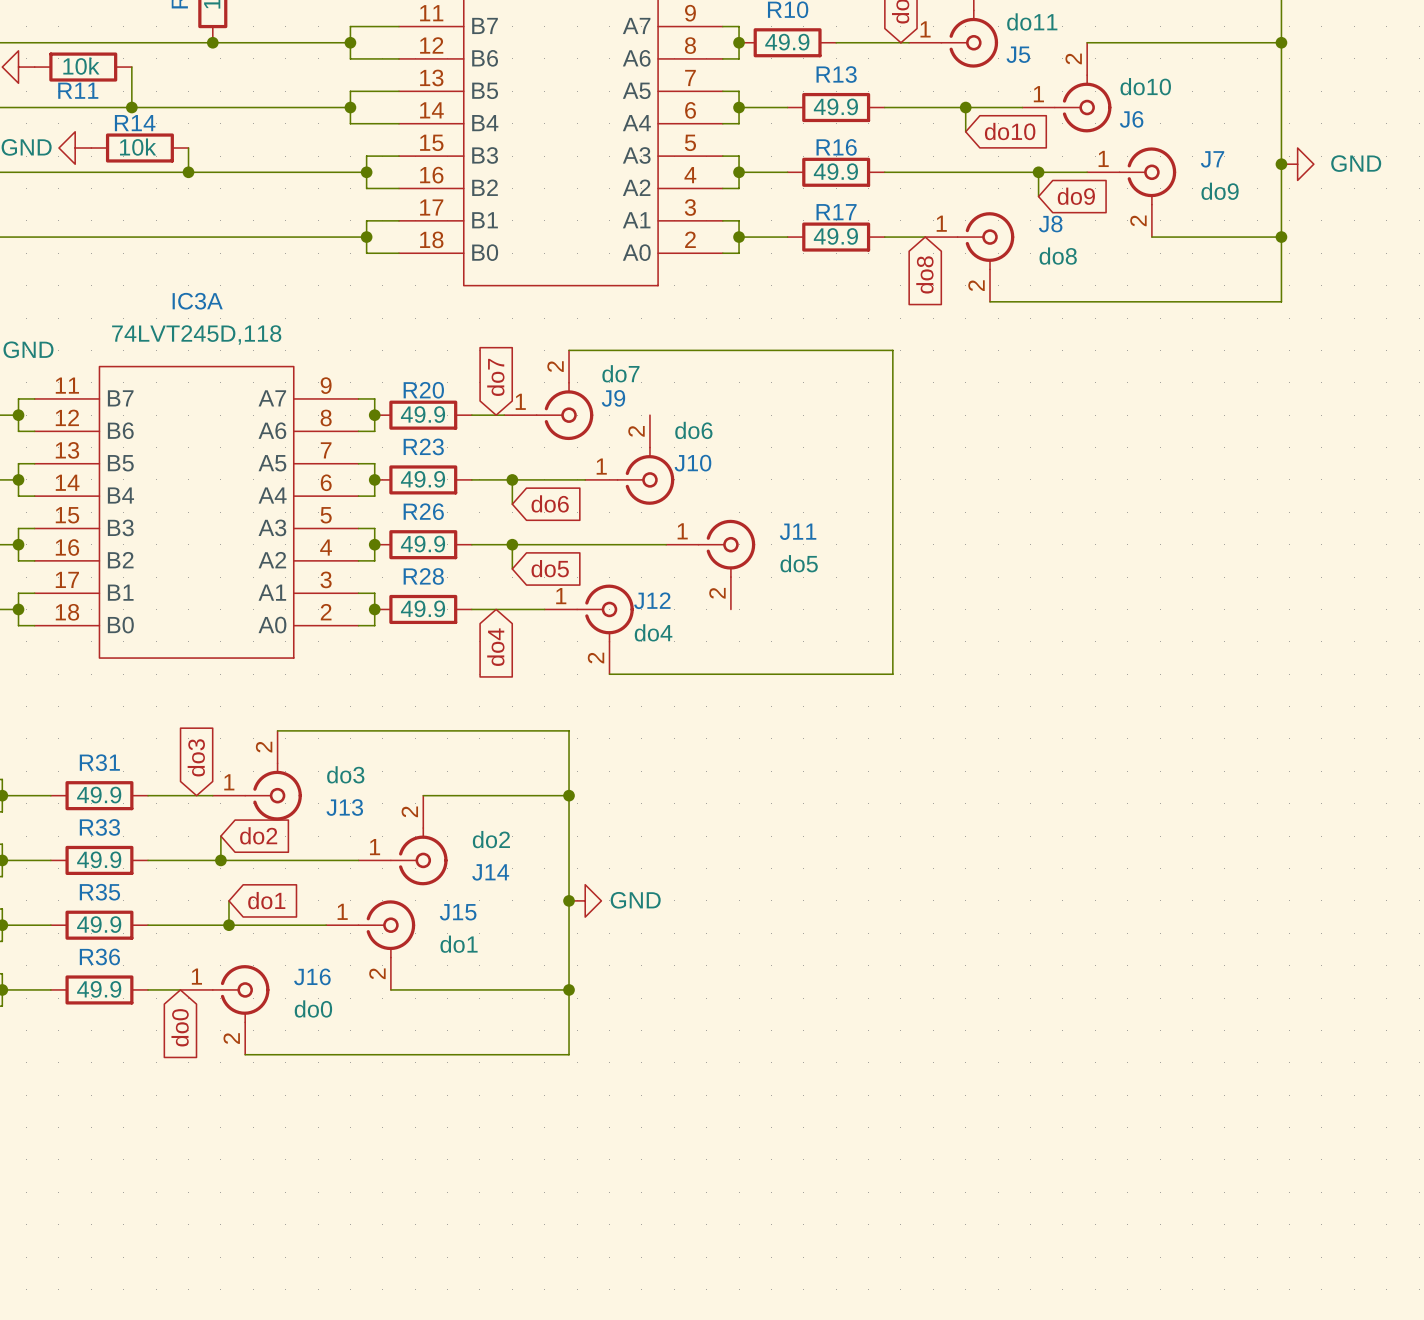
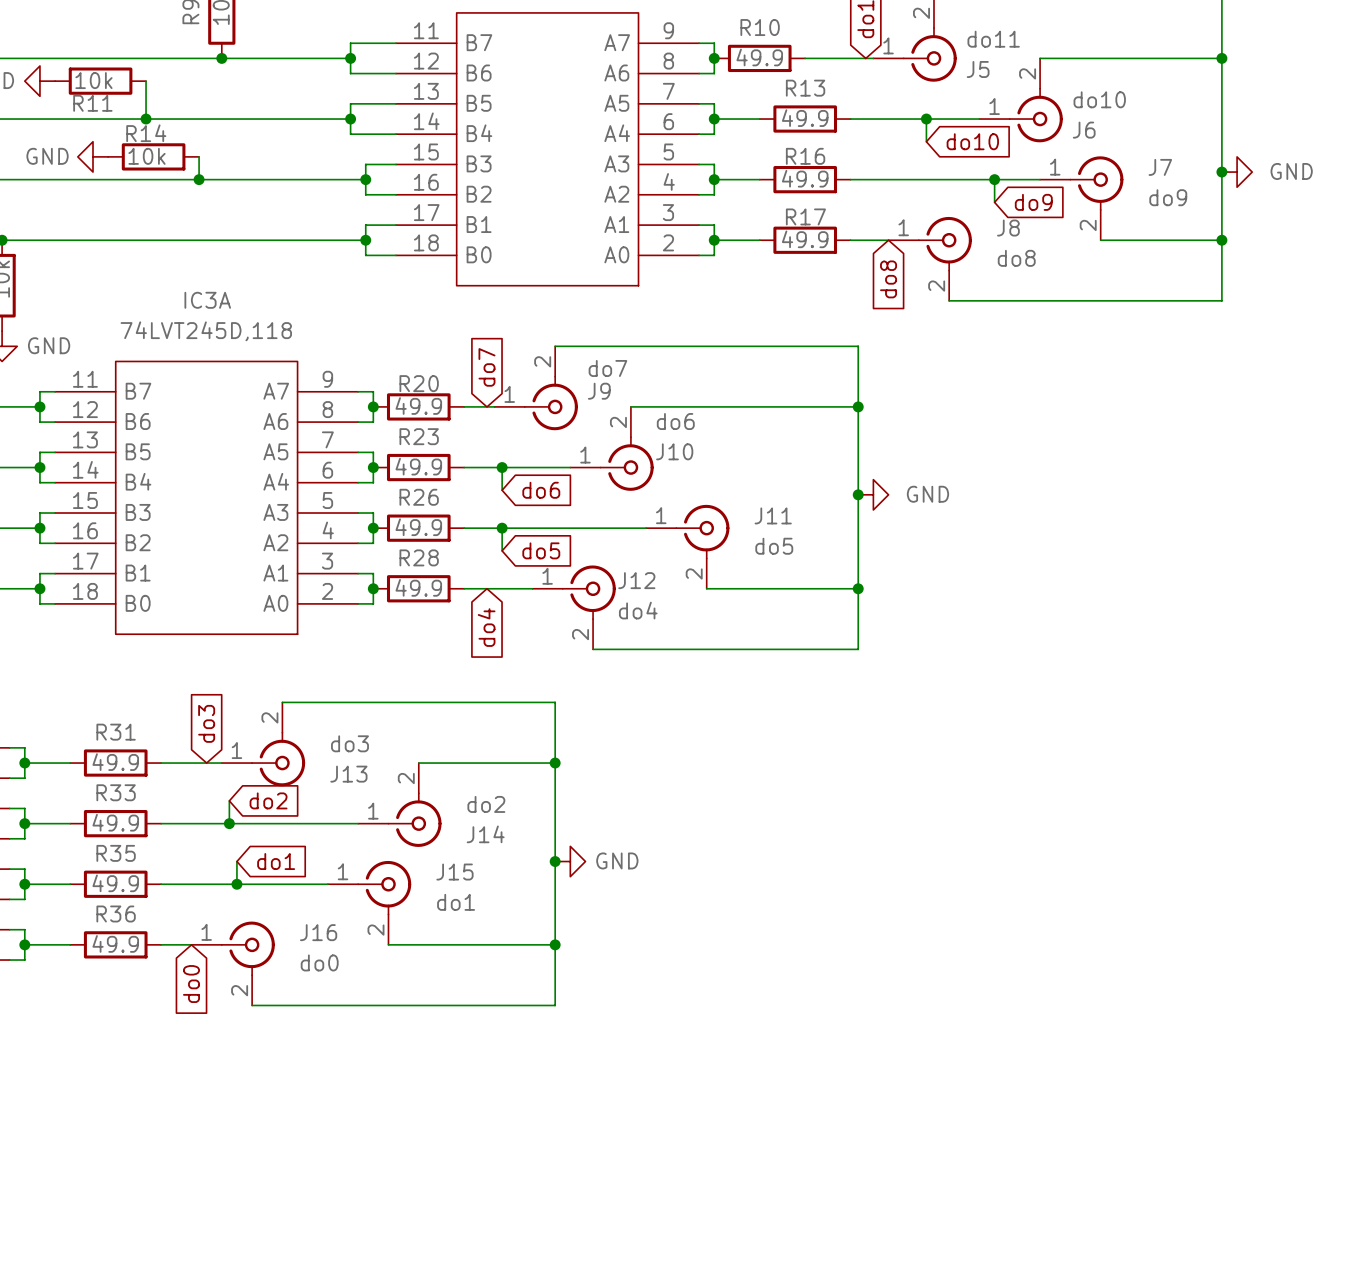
wire: none -> (630, 406) (858, 406)
junction: none -> (858, 406)
junction: none -> (858, 494)
power symbol: none -> GND (873, 494)
wire: none -> (706, 588) (858, 588)
junction: none -> (858, 588)

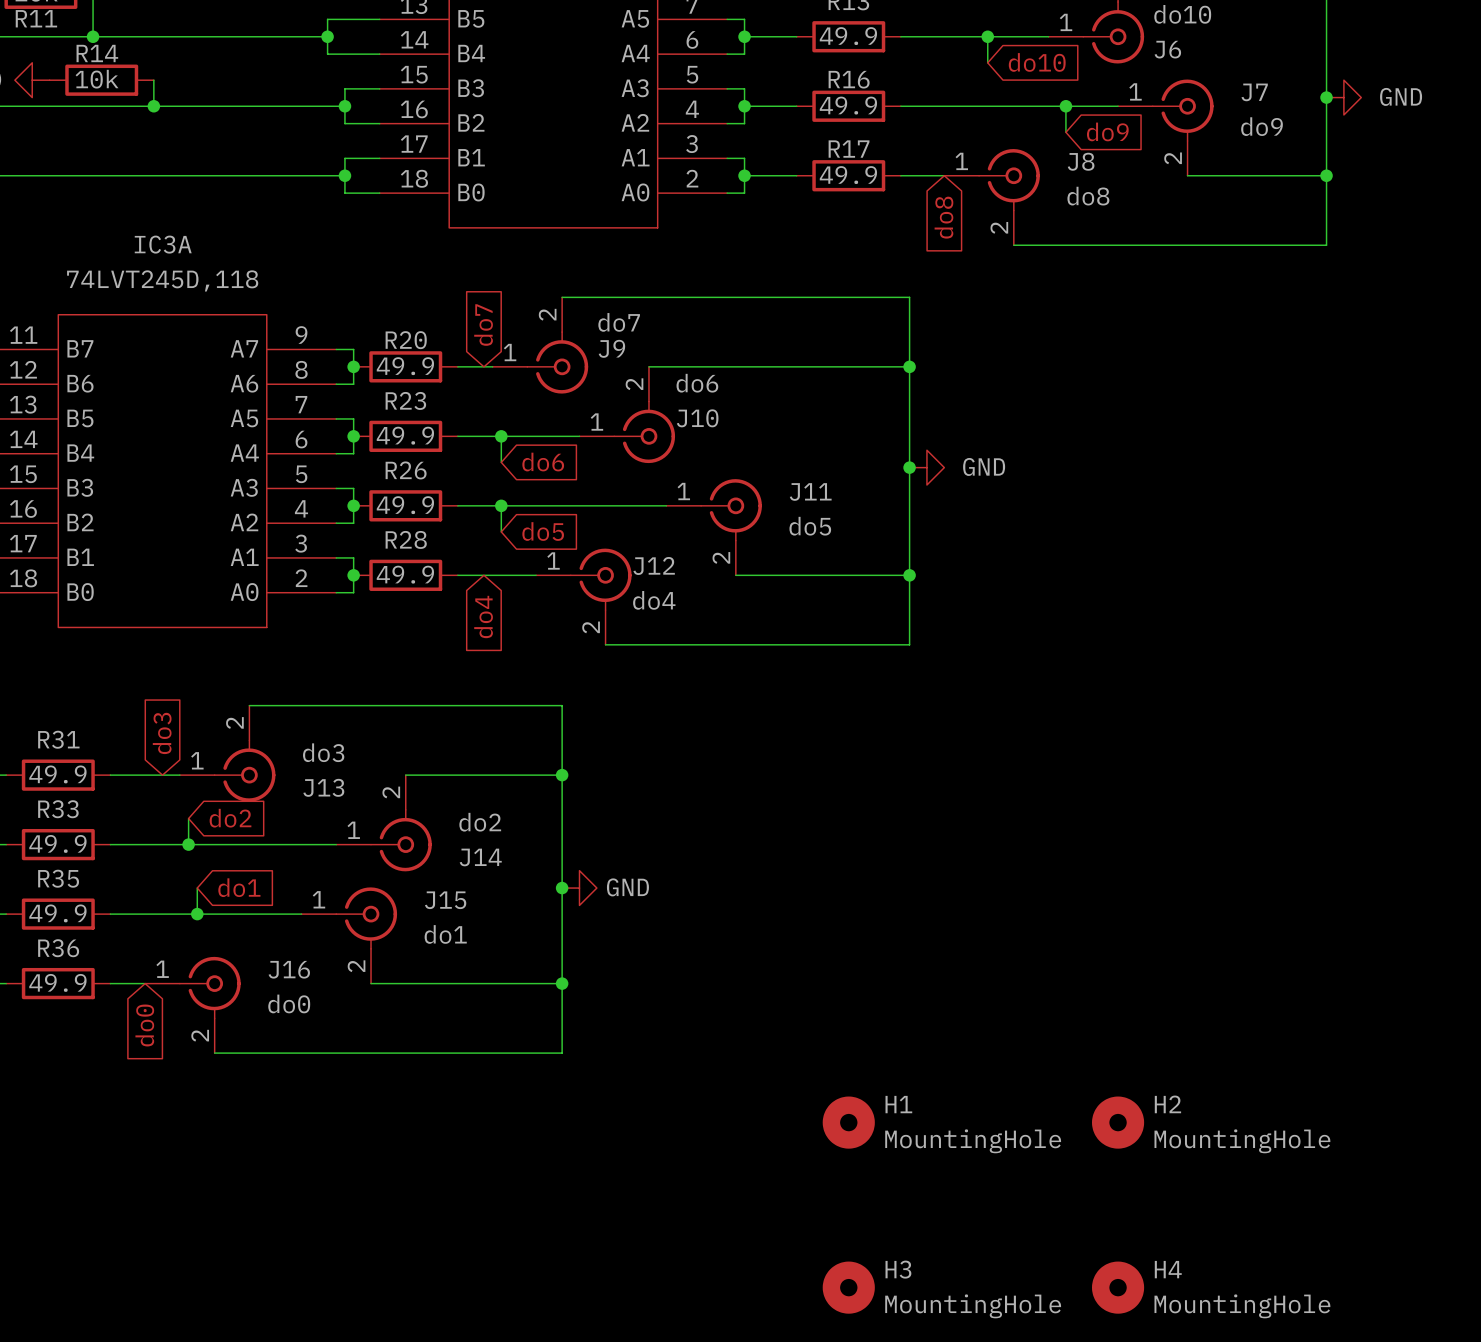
H1: none -> MountingHole (848, 1122)
H2: none -> MountingHole (1118, 1122)
H3: none -> MountingHole (848, 1287)
H4: none -> MountingHole (1118, 1287)

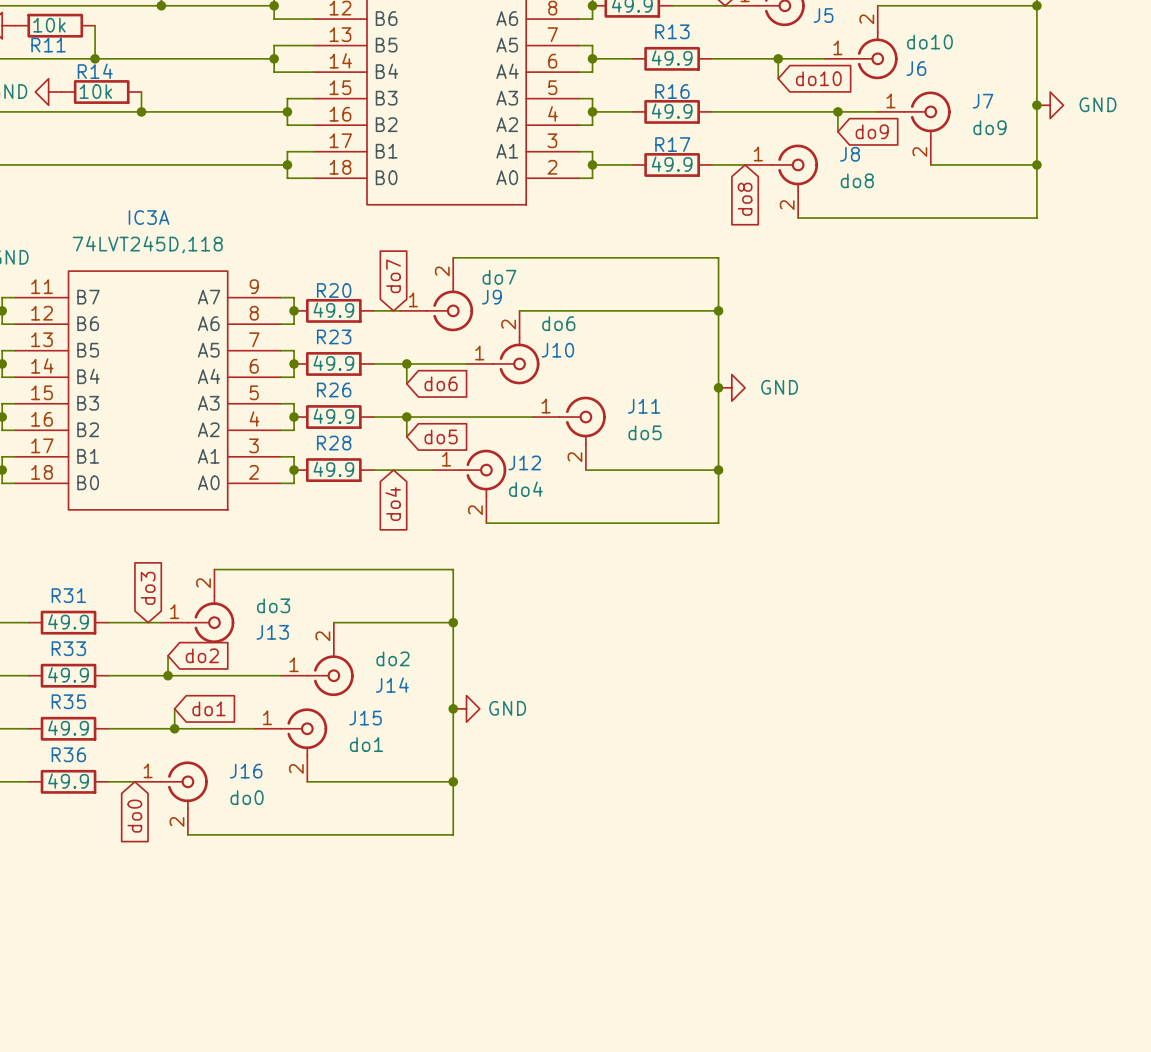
H1: MountingHole (848, 1122) -> none
H2: MountingHole (1118, 1122) -> none
H3: MountingHole (848, 1287) -> none
H4: MountingHole (1118, 1287) -> none

